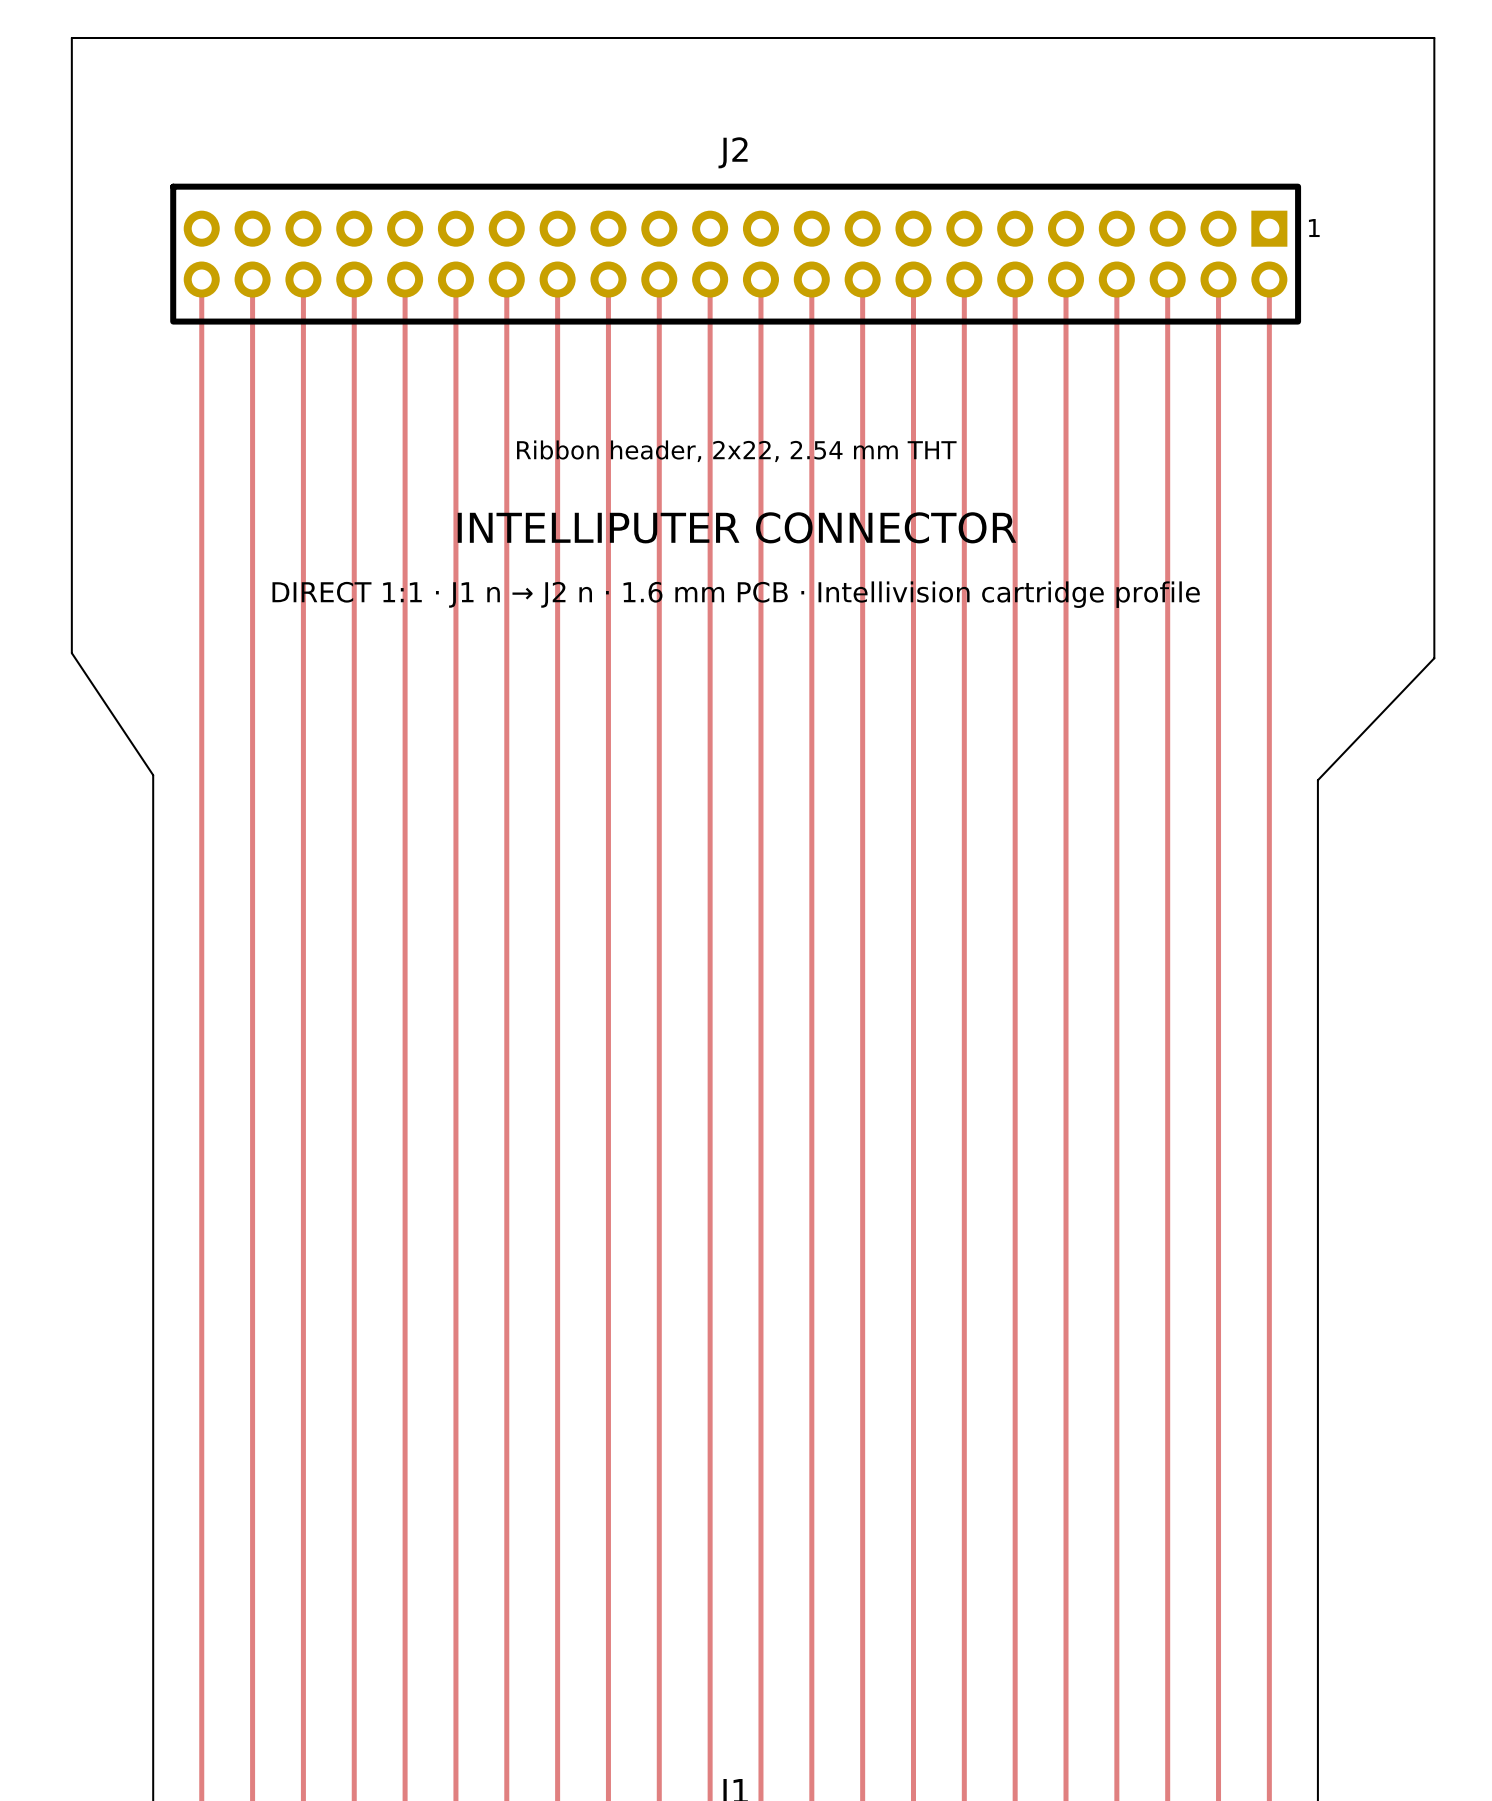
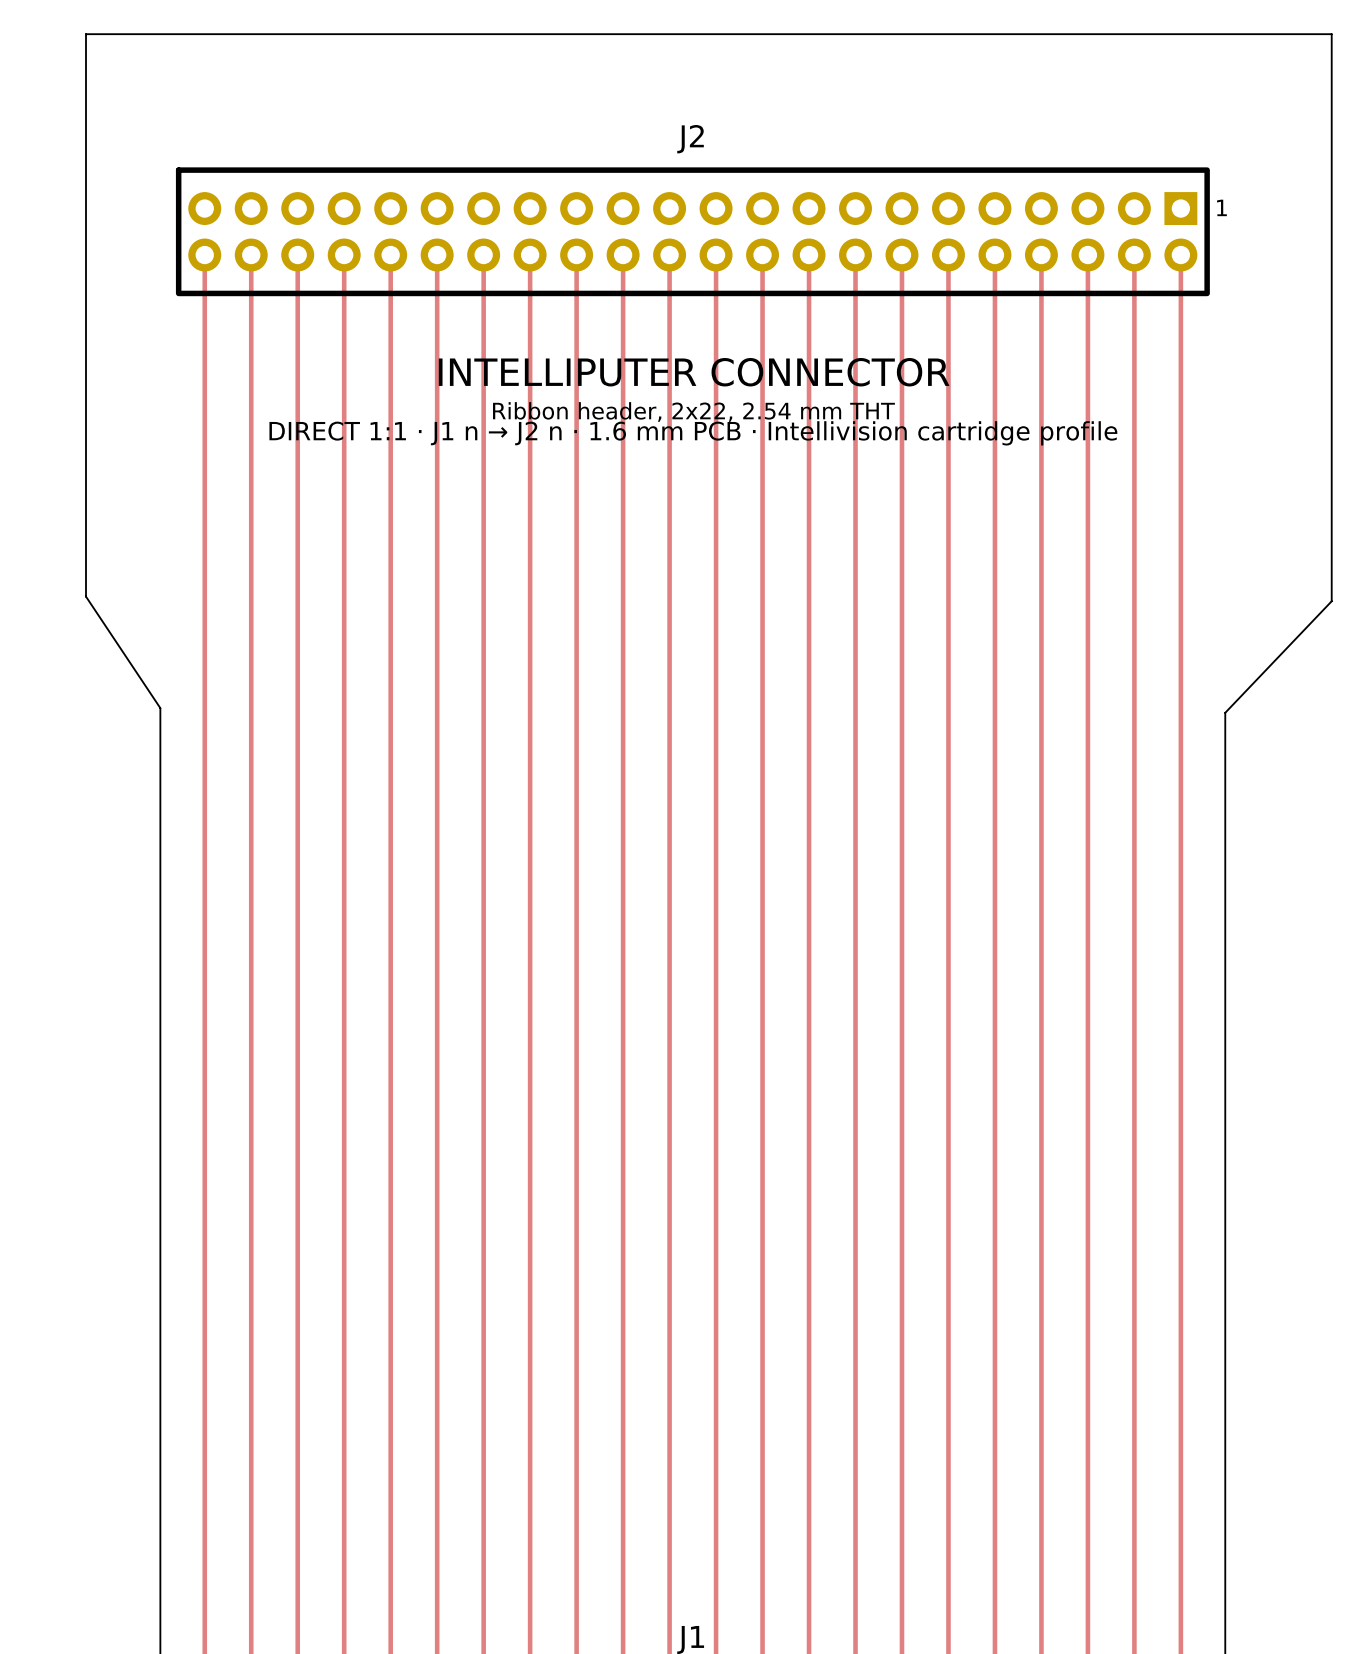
text position: INTELLIPUTER CONNECTOR (736, 527) -> INTELLIPUTER CONNECTOR (694, 372)
text position: DIRECT 1:1 · J1 n → J2 n · 1.6 mm PCB · Intellivision cartridge profile (736, 594) -> DIRECT 1:1 · J1 n → J2 n · 1.6 mm PCB · Intellivision cartridge profile (693, 433)

